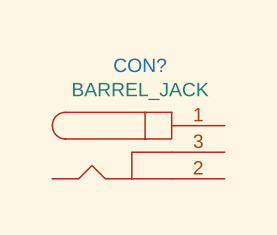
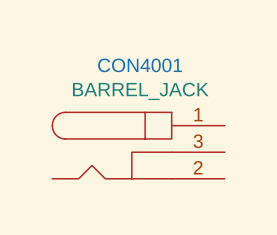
CON? name: CON? (140, 65) -> CON4001 (140, 65)

